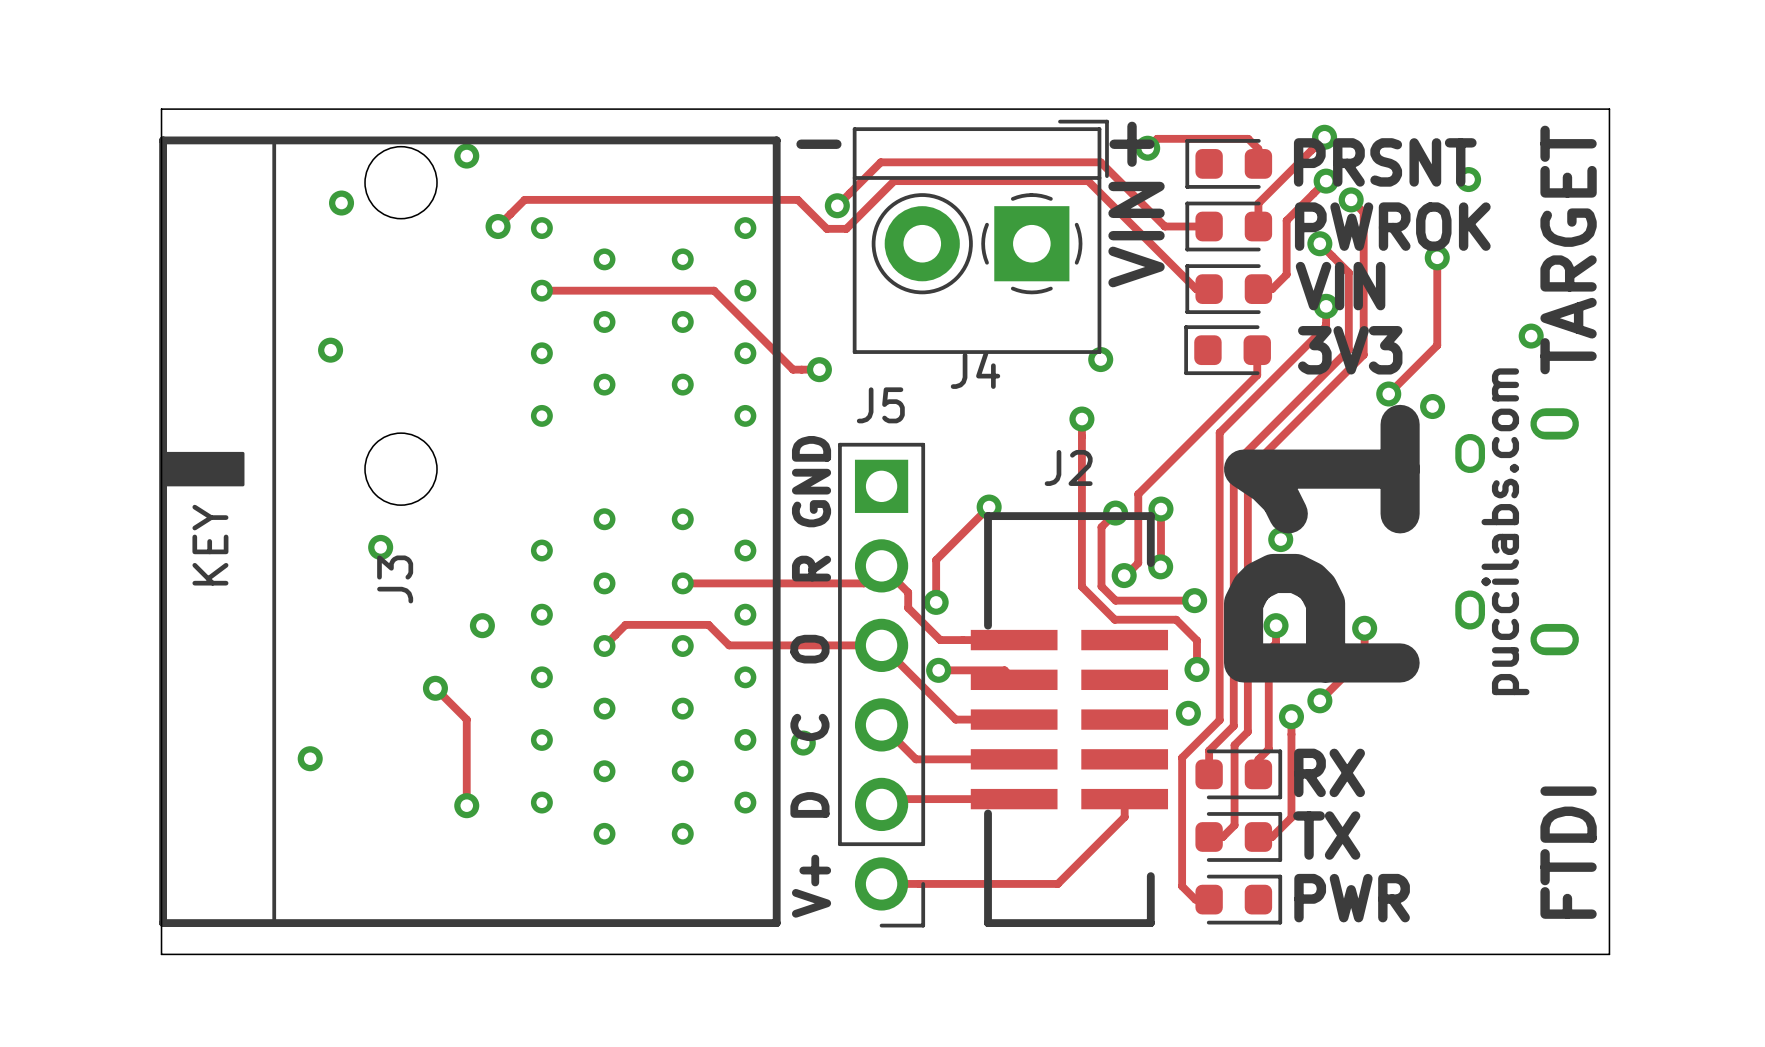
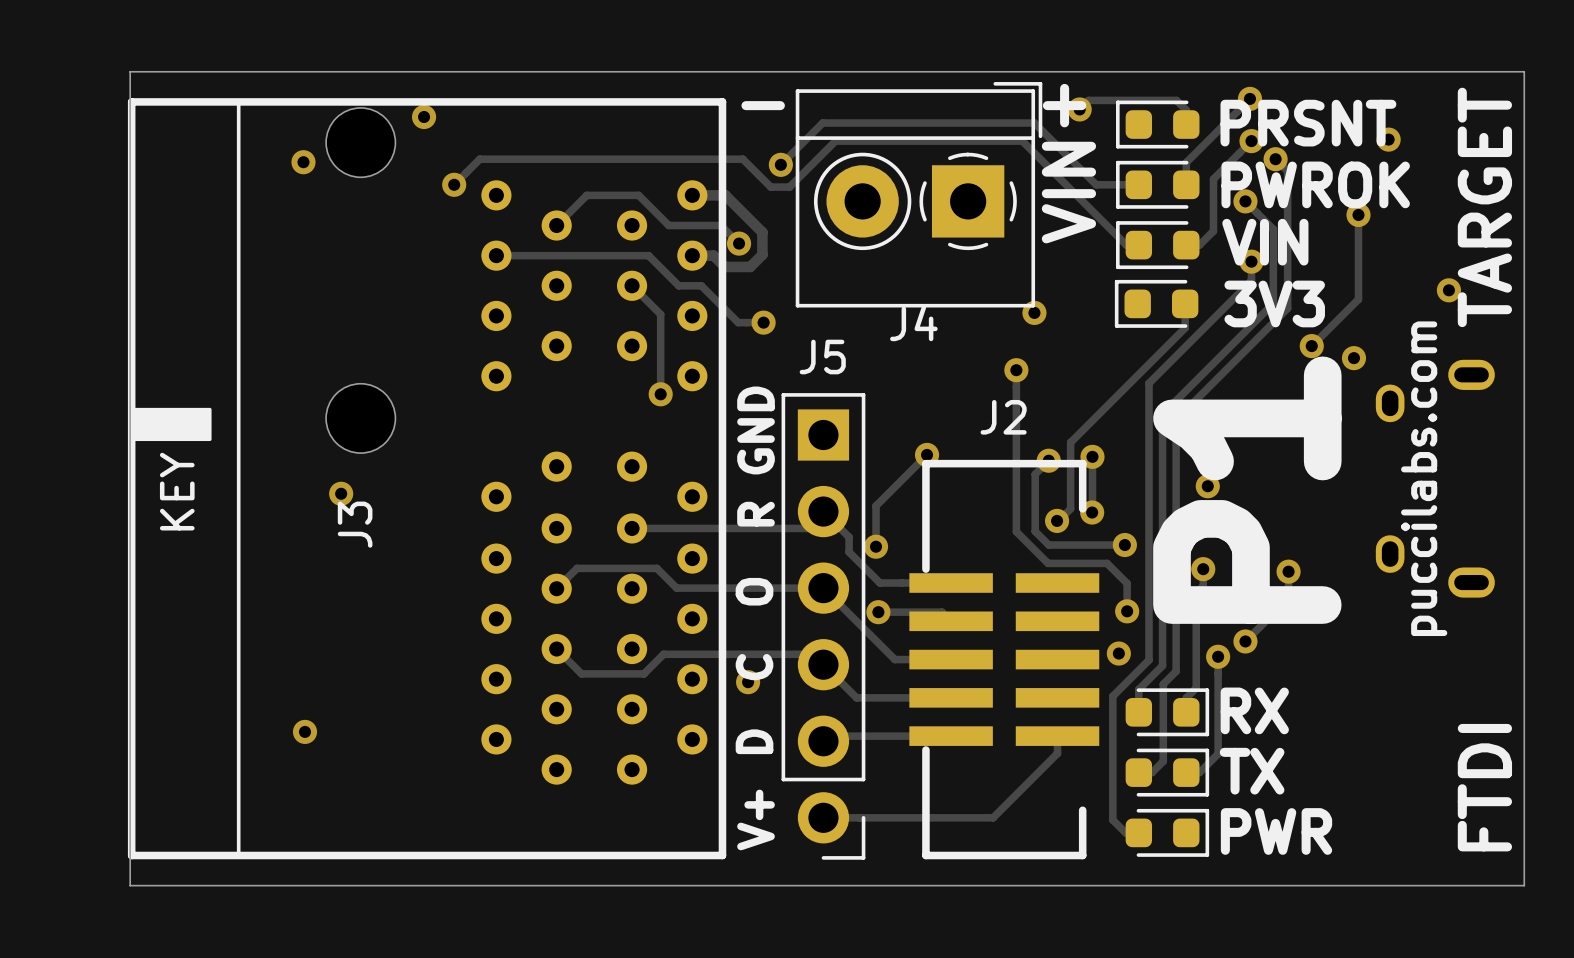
J3 footprint: [159, 136, 781, 927] -> [127, 98, 727, 860]
track: none -> (692, 195) (725, 195) (762, 232) (762, 254) (750, 266) (724, 266) (713, 255) (692, 255)
track: none -> (556, 225) (586, 195) (638, 195) (668, 225) (720, 225) (739, 243)
via: none -> (739, 243)
track: (541, 290) (714, 290) (754, 331) -> (496, 246) (505, 255) (648, 255) (678, 285) (701, 285)
track: none -> (632, 285) (660, 314) (660, 394)
via: (330, 350) -> none
via: none -> (660, 394)
via: (482, 625) -> none
track: (435, 688) (466, 719) (466, 805) -> none
via: (435, 688) -> none
track: none -> (556, 649) (581, 673) (643, 673) (663, 654) (813, 654) (823, 664)
via position: (310, 758) -> (305, 731)
via: (466, 805) -> none

